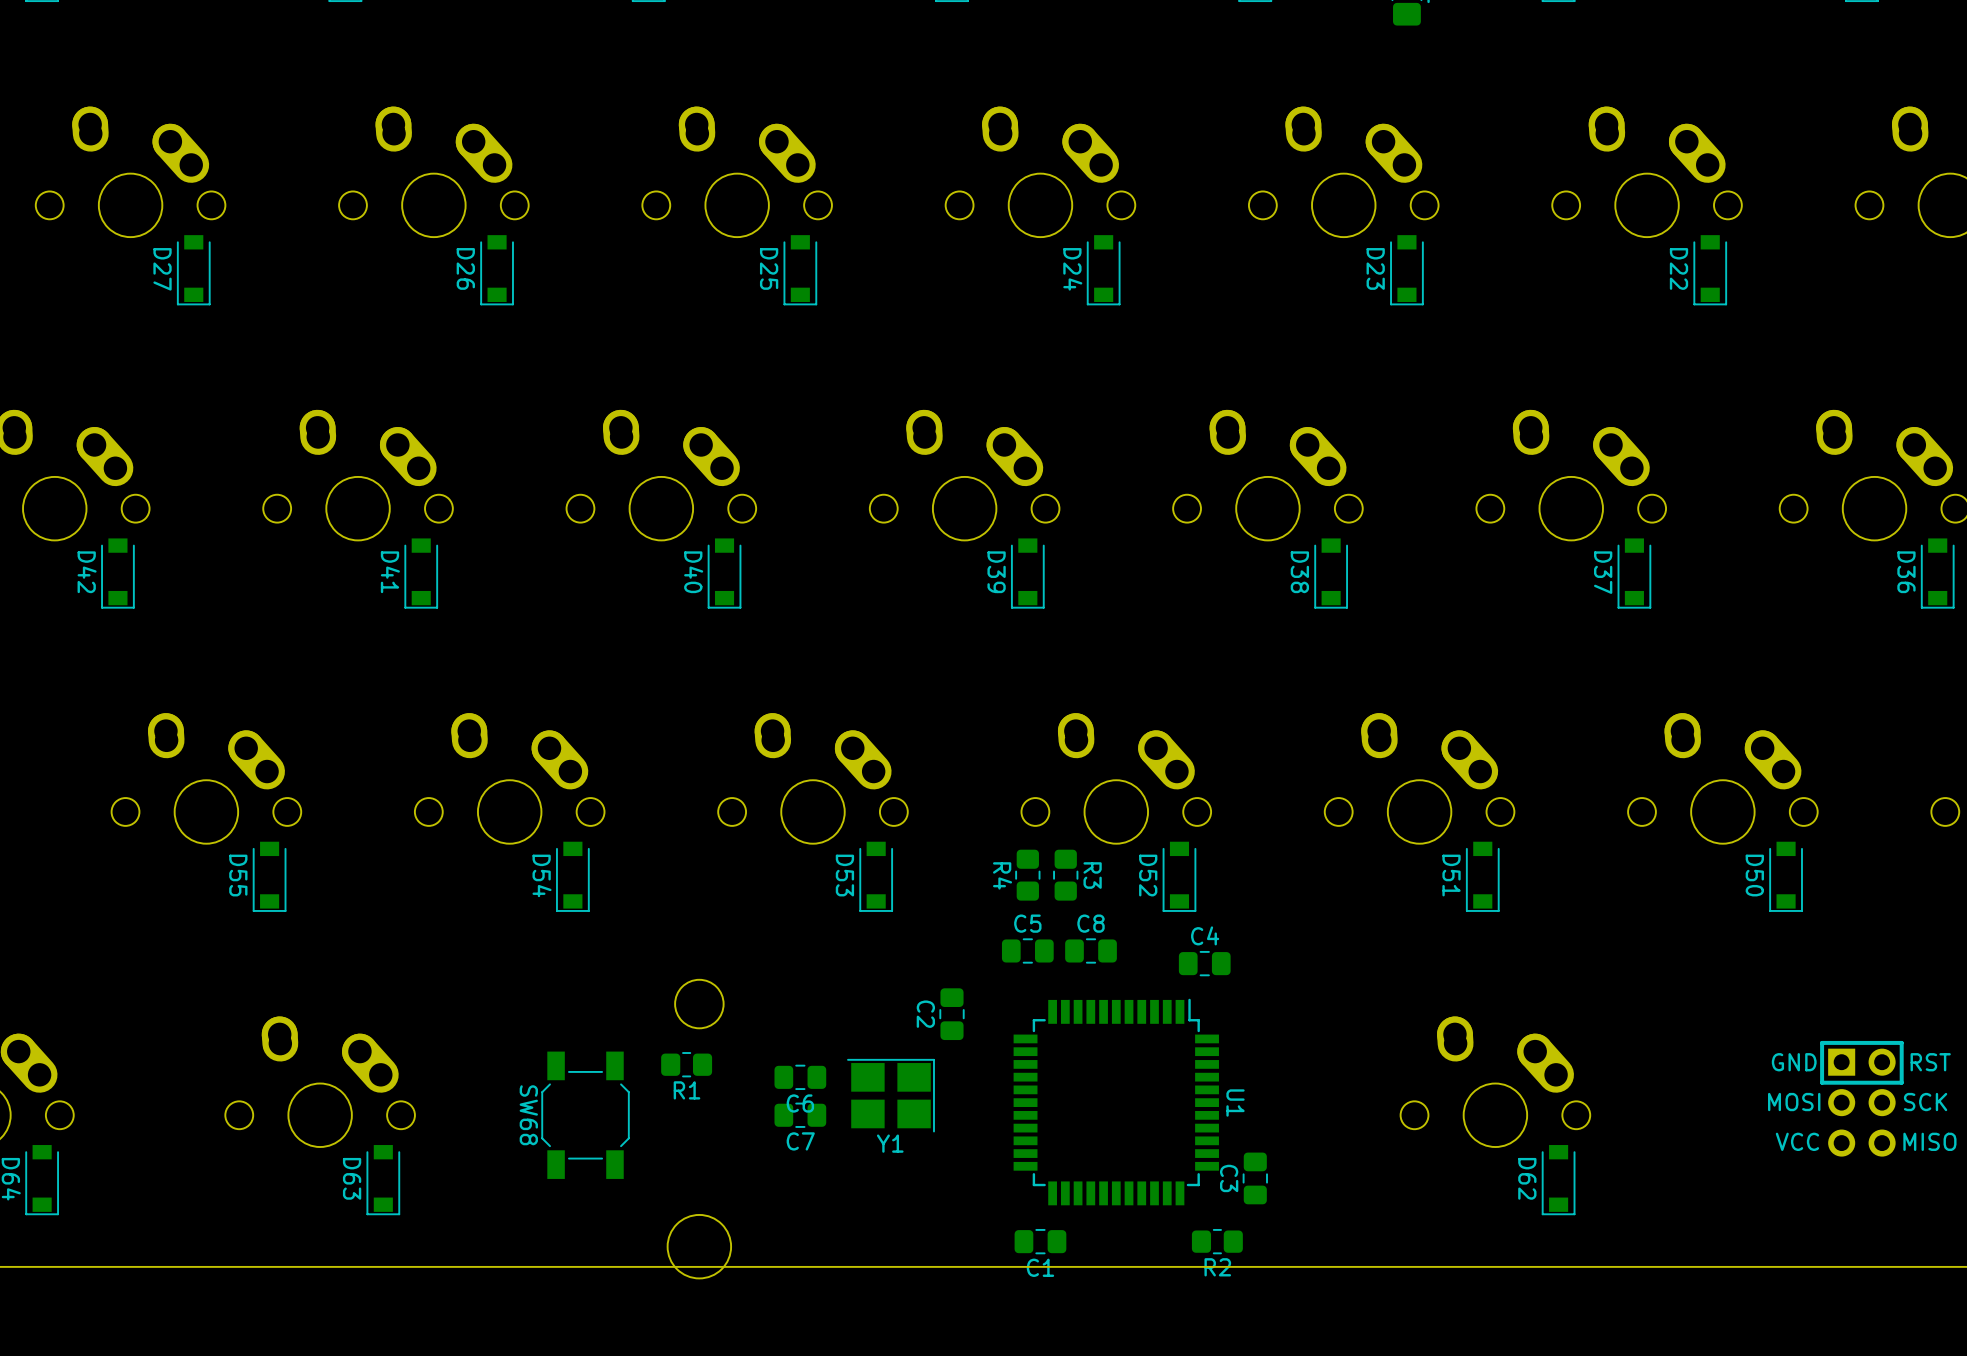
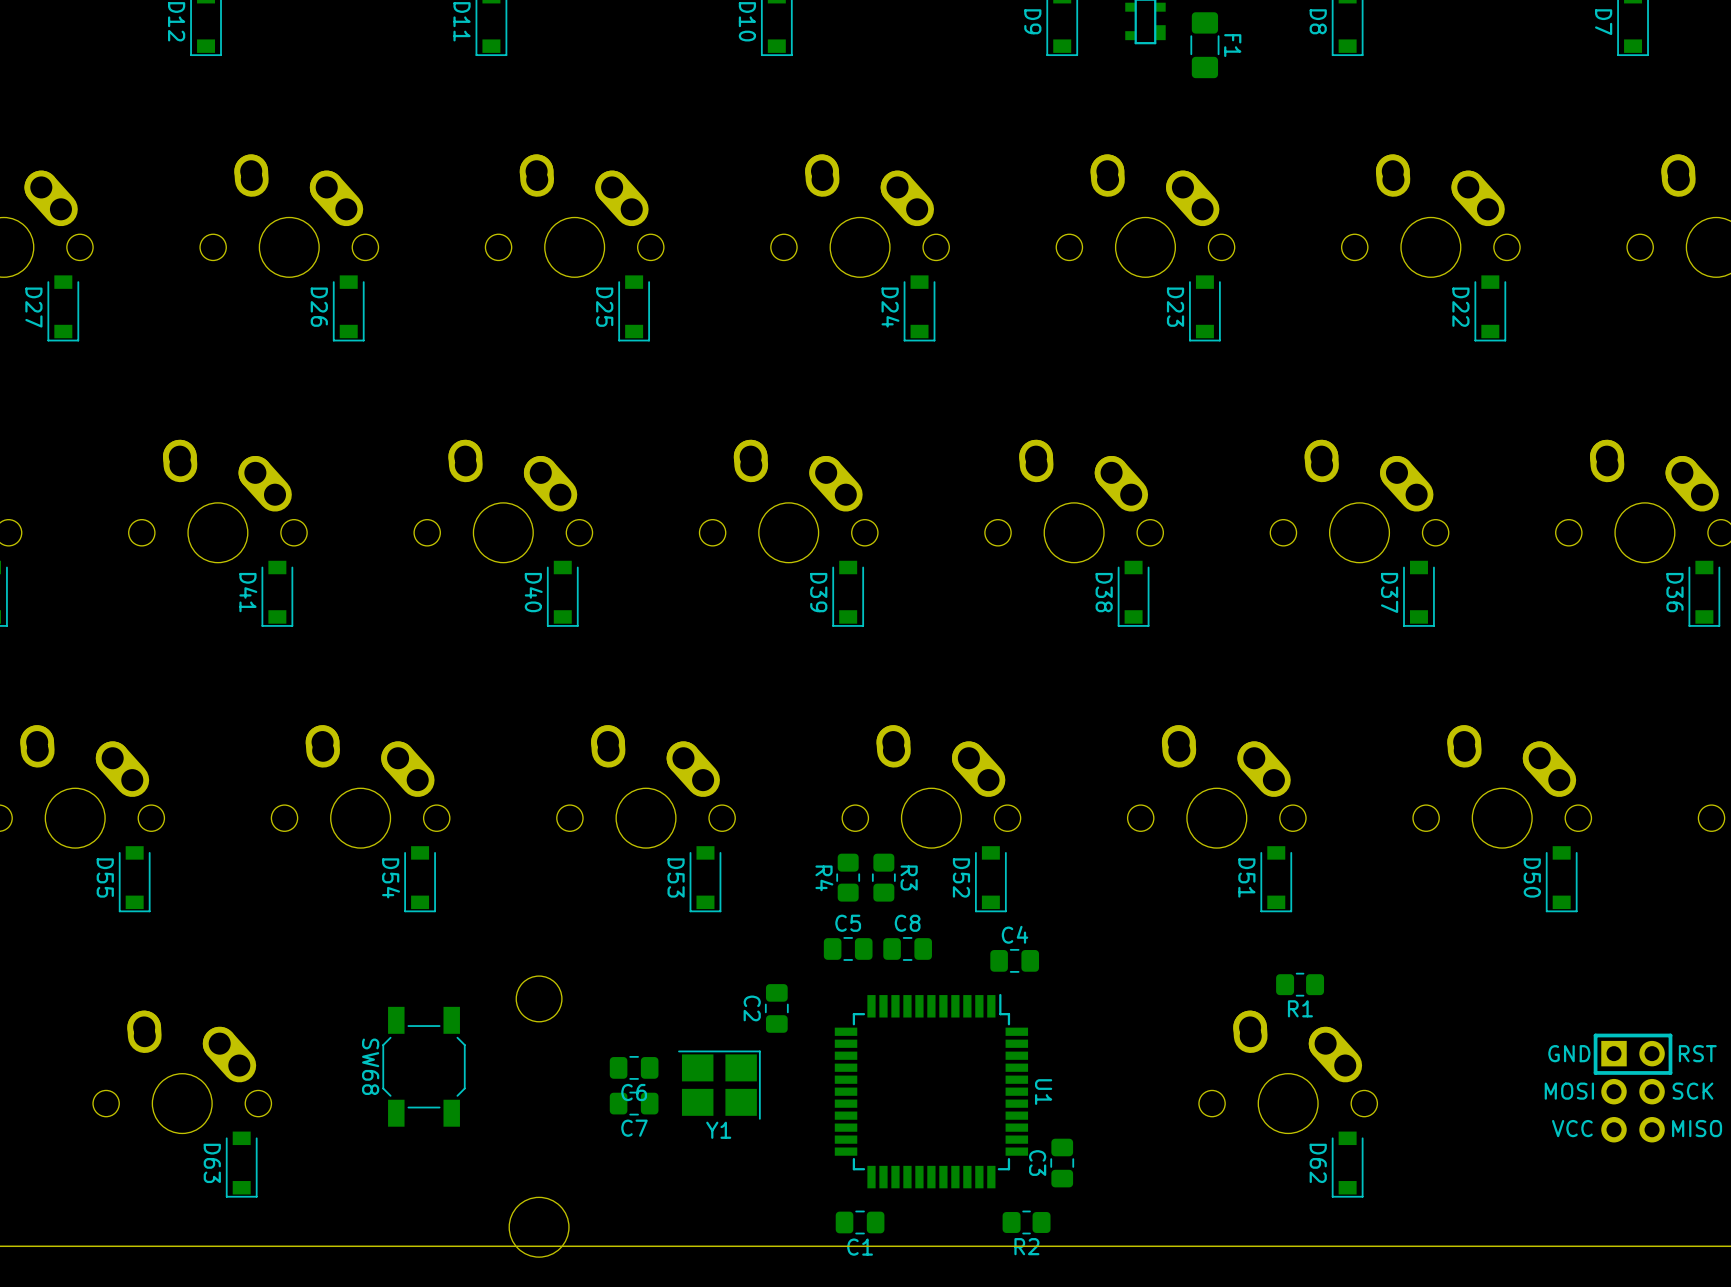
R1 position: (686, 1064) -> (1300, 984)
SW68 position: (585, 1115) -> (424, 1066)

